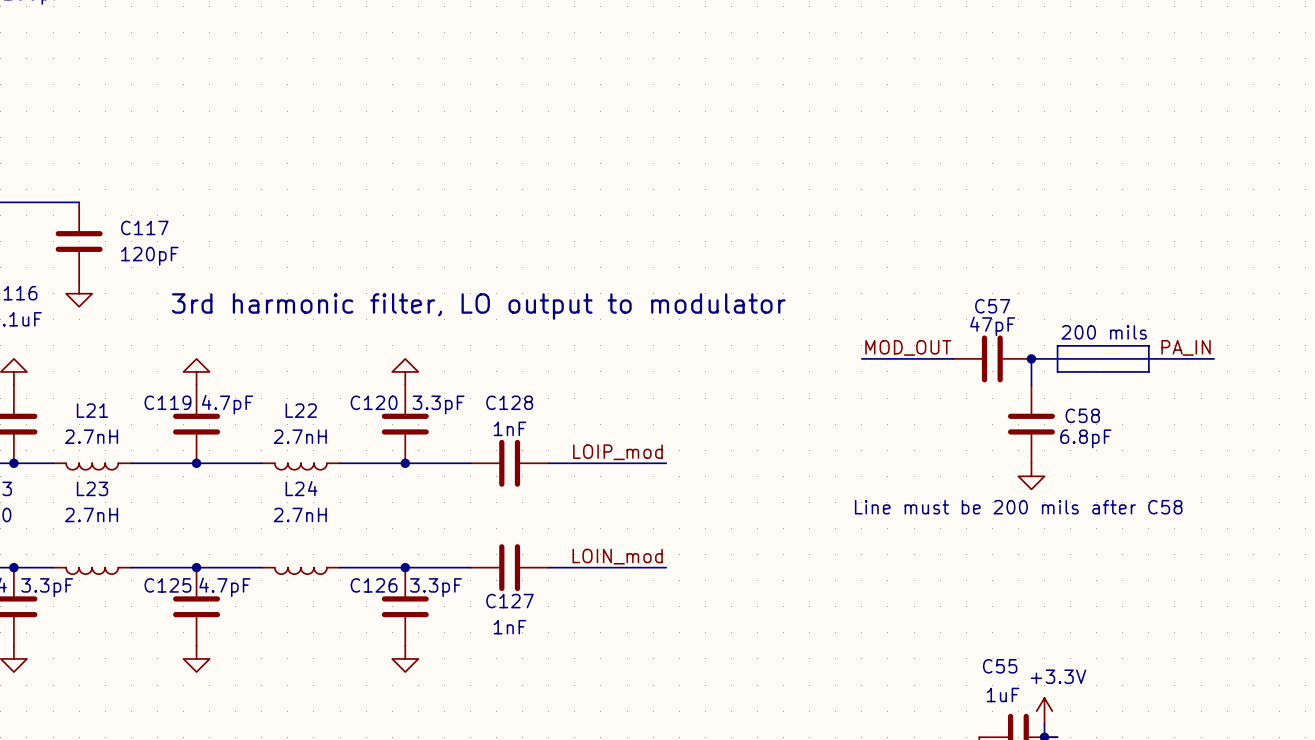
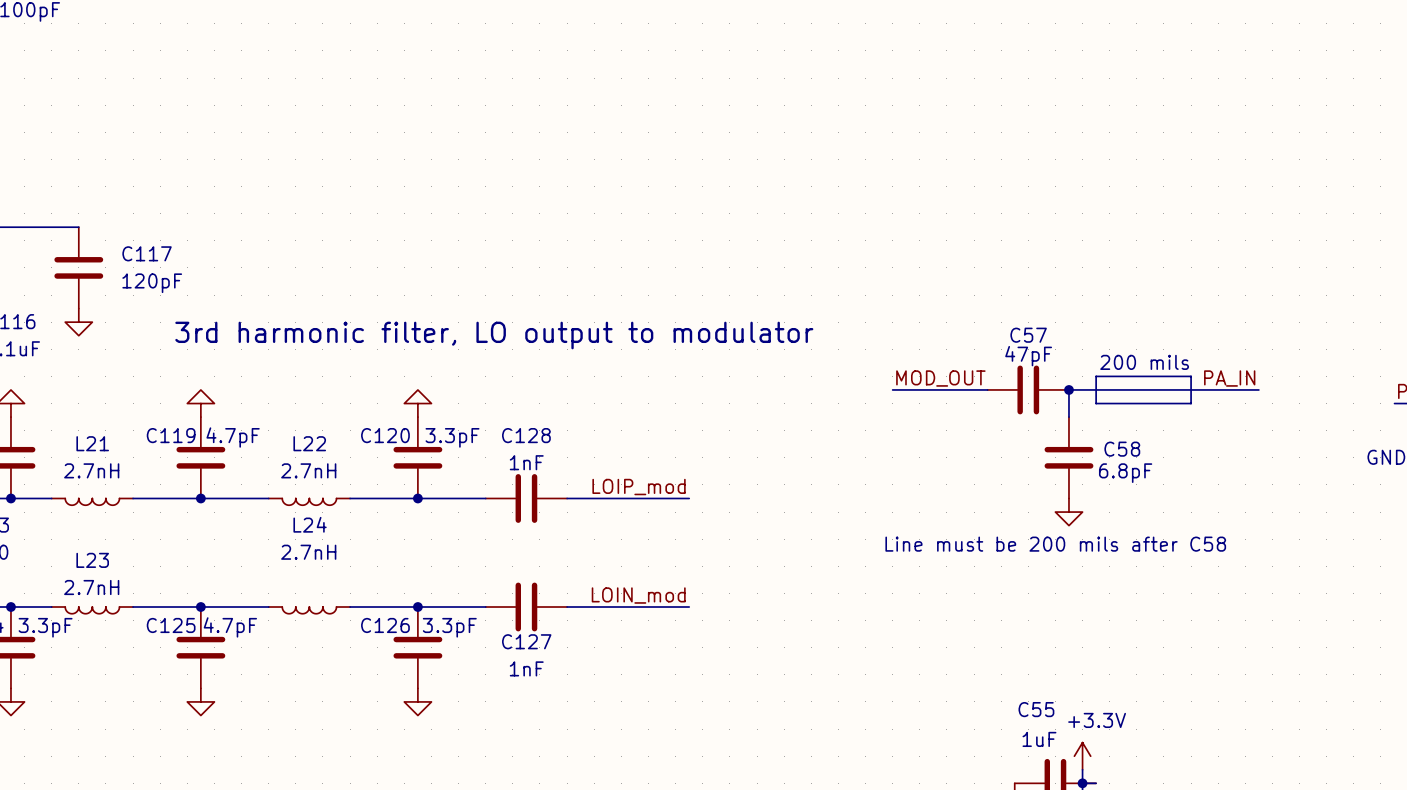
L23 name position: L23 (92, 488) -> L23 (92, 560)
L23 value position: 2.7nH (91, 514) -> 2.7nH (91, 587)

